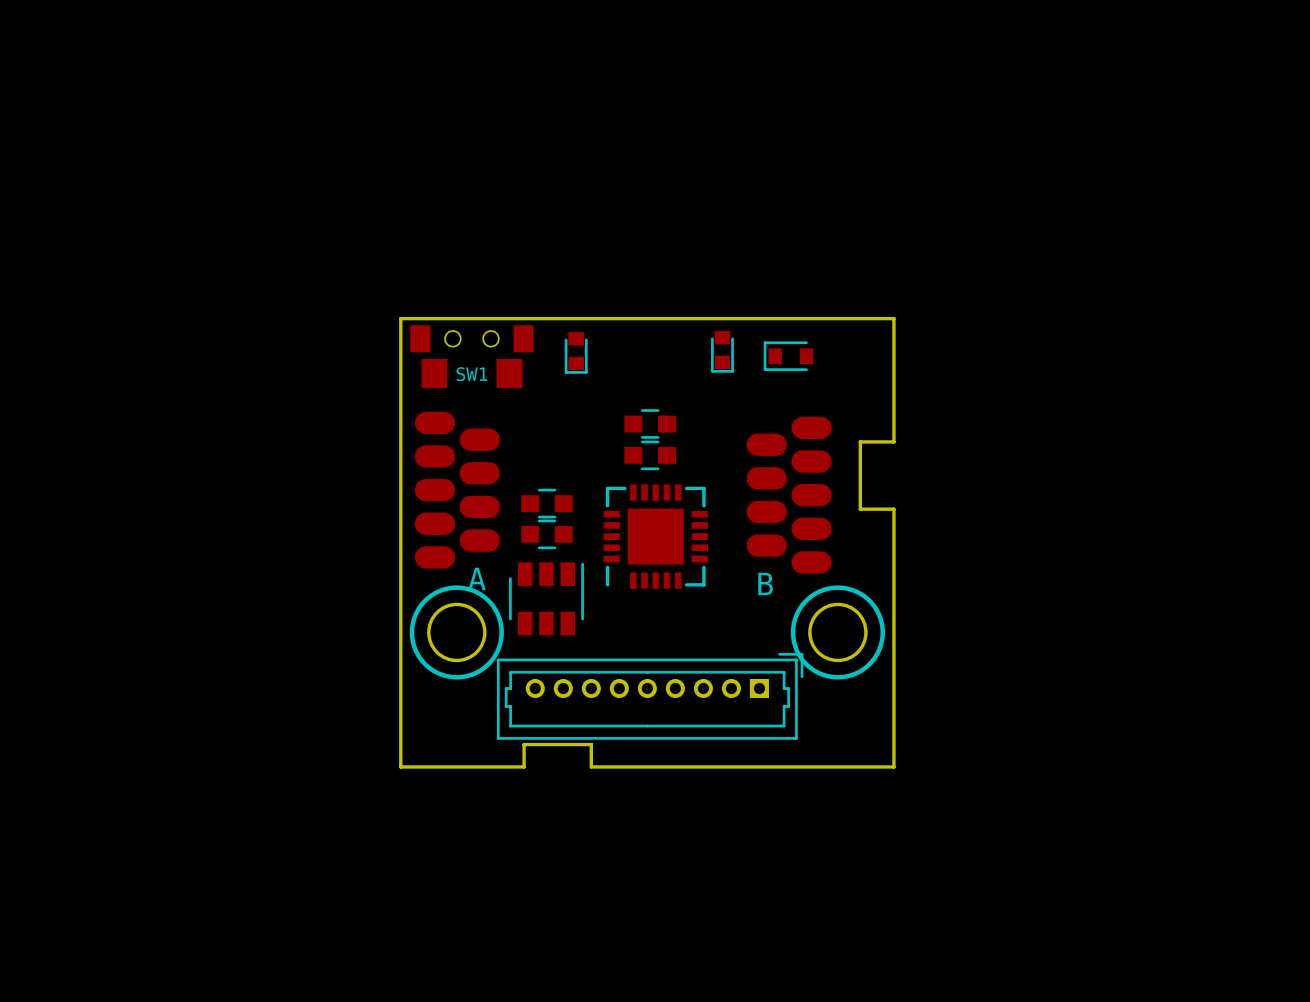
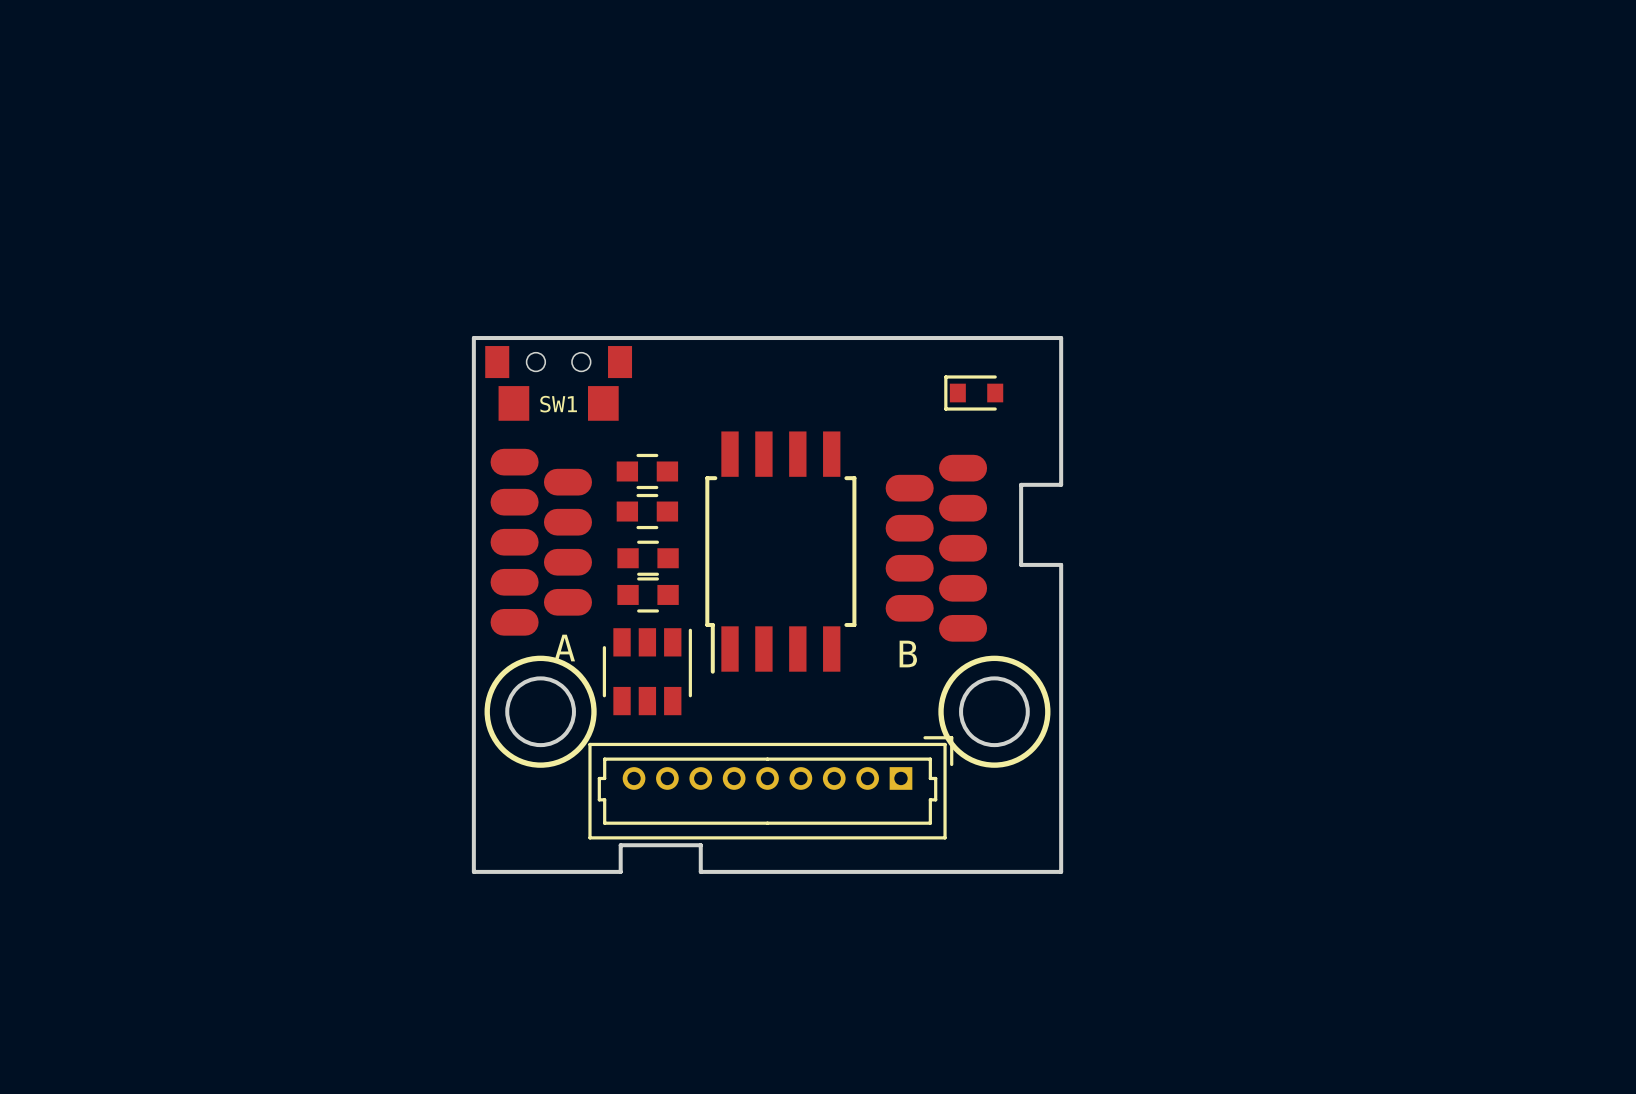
part: (722, 351) -> none
part: (576, 352) -> none
part position: (788, 356) -> (973, 393)
part: (650, 423) -> none
part: none -> (647, 471)
part: (650, 455) -> none
part: none -> (647, 511)
part: none -> (780, 552)
part: (655, 536) -> none

